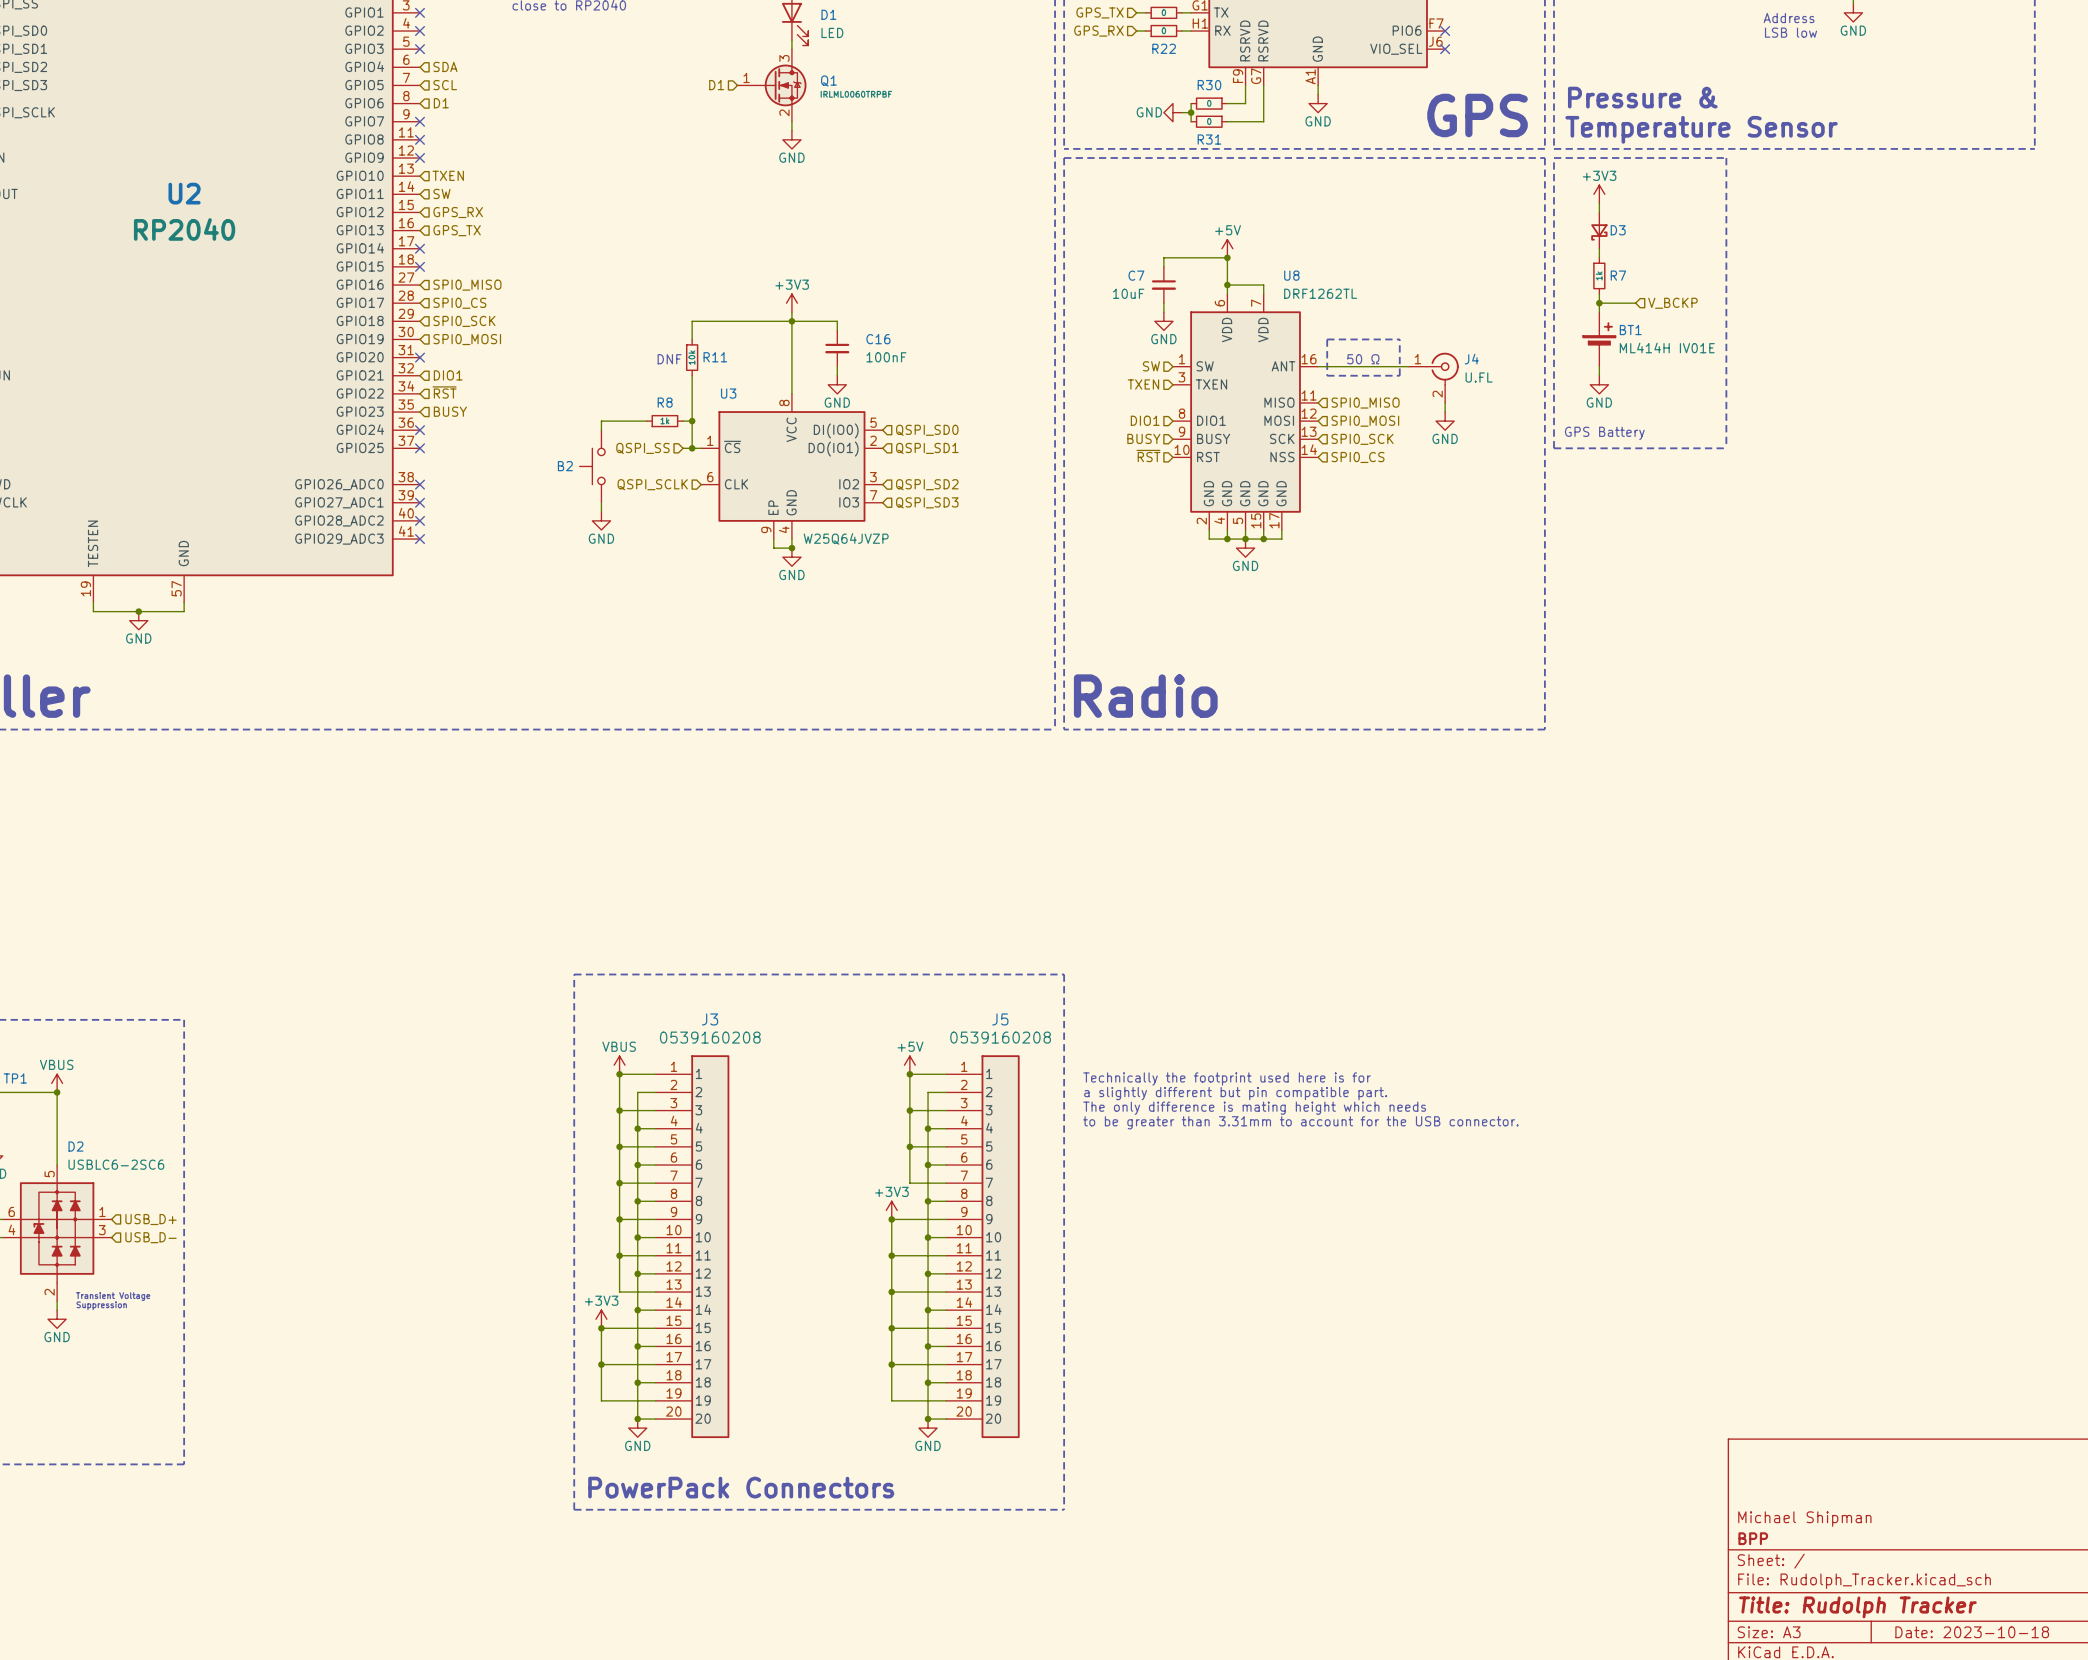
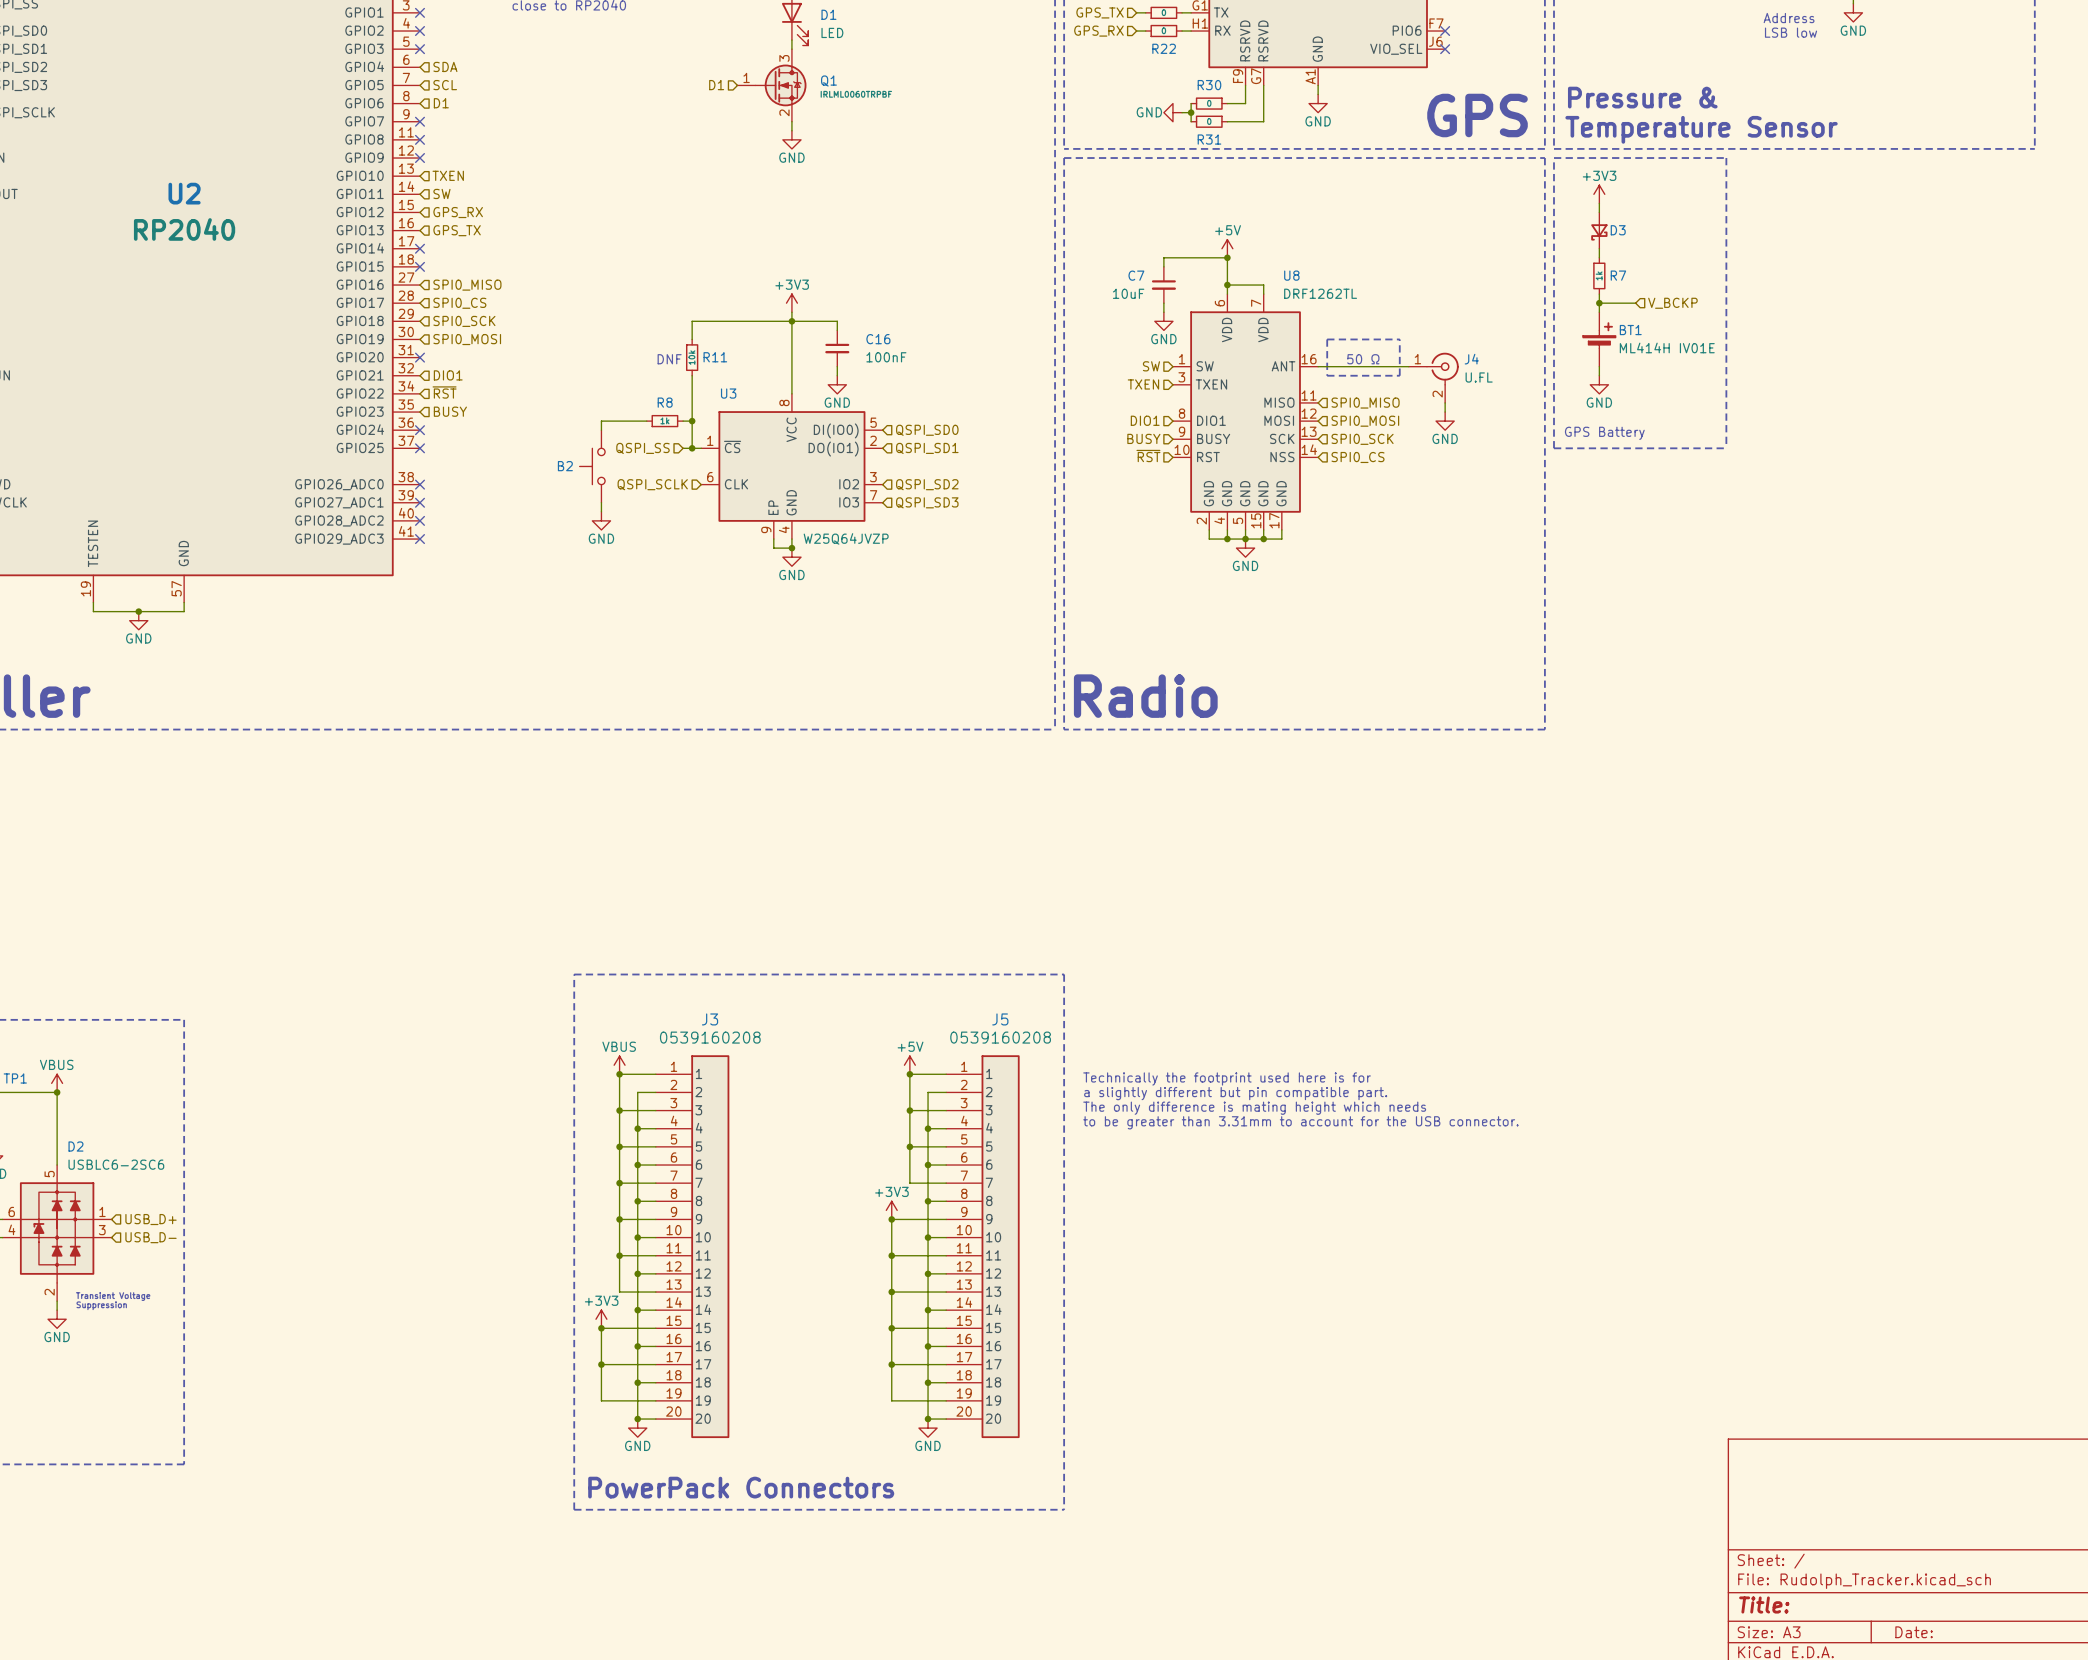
title block: Michael Shipman (1804, 1519) -> none
title block: BPP (1753, 1538) -> none
title block: Title: Rudolph Tracker (1857, 1607) -> Title: (1764, 1605)
title block: Date: 2023-10-18 (1972, 1632) -> Date: (1914, 1632)

